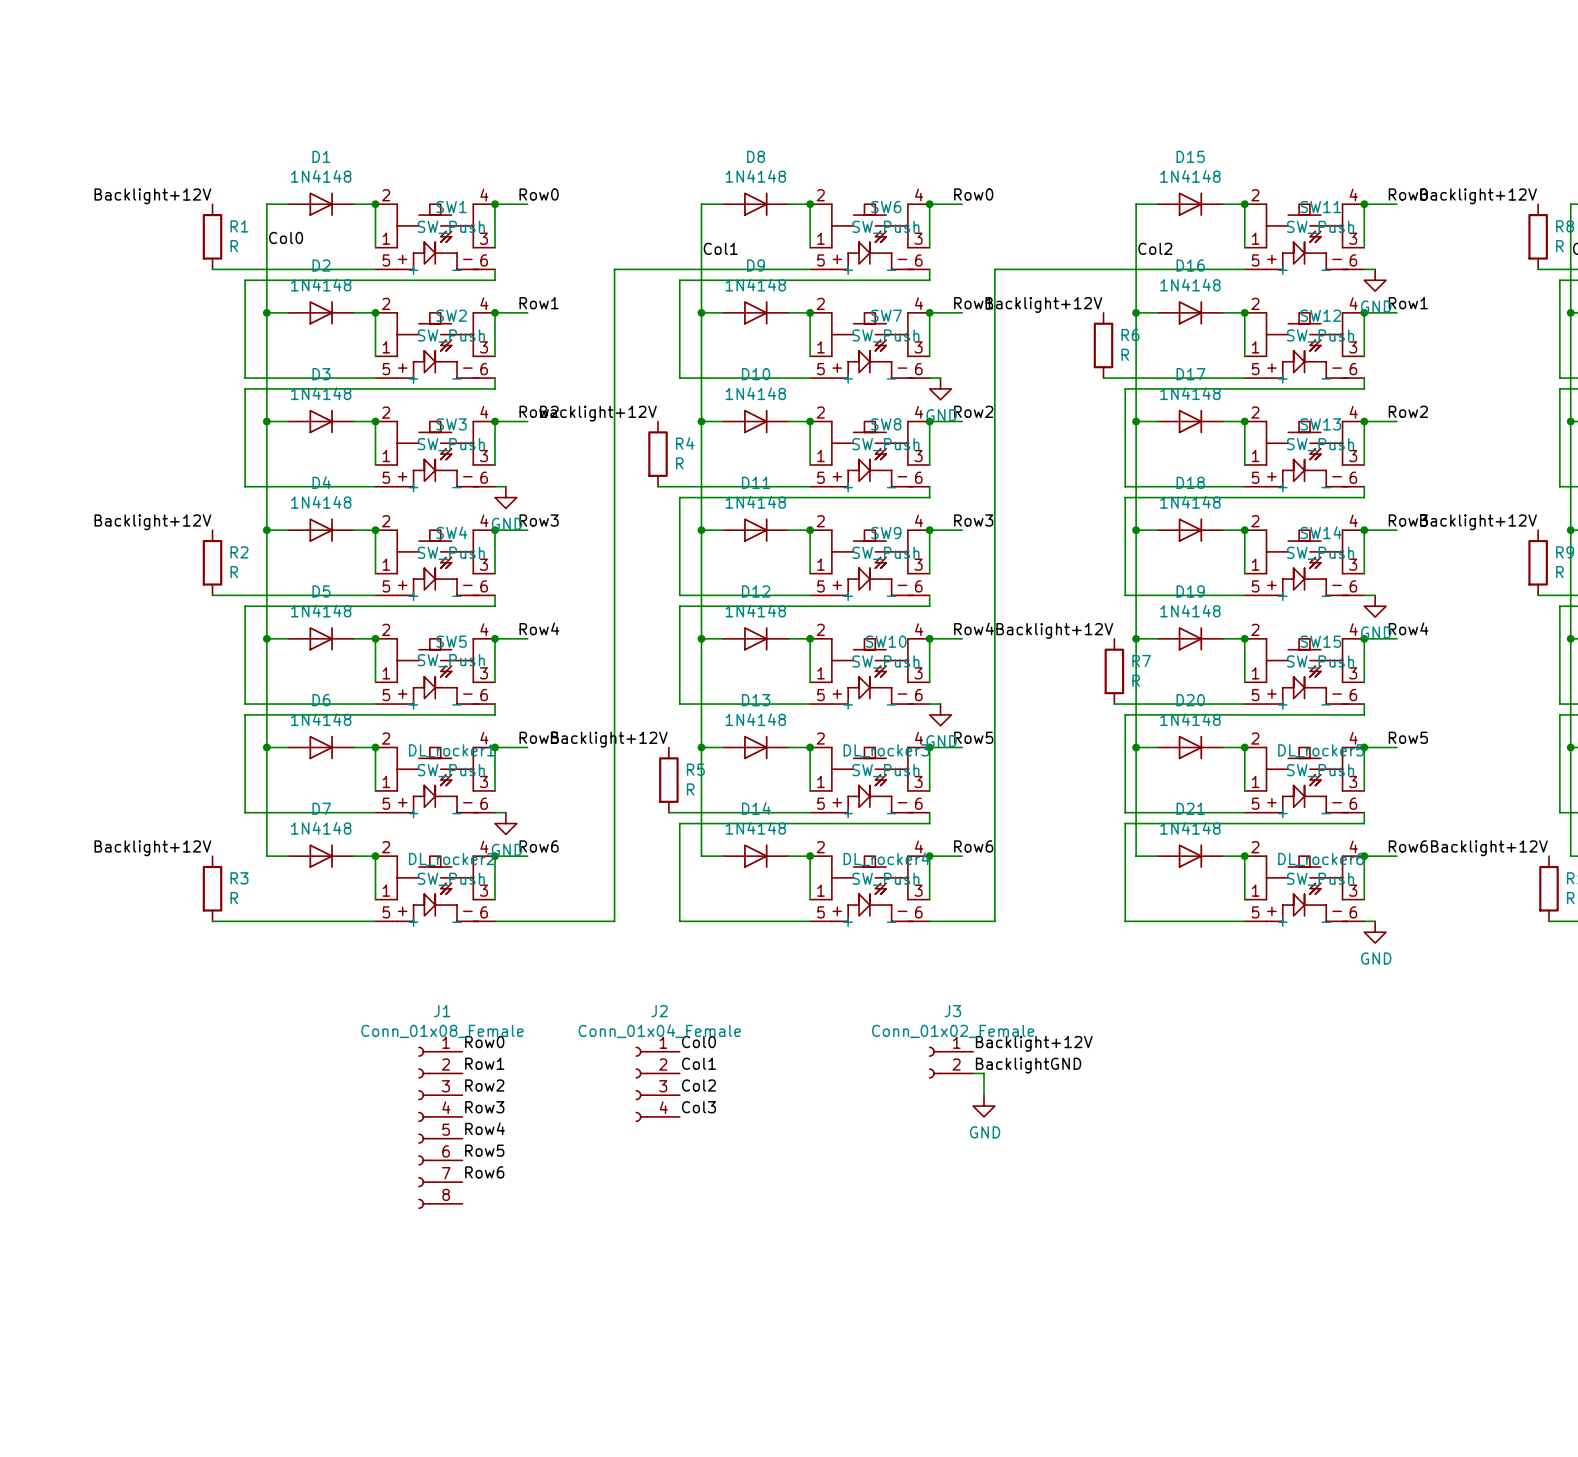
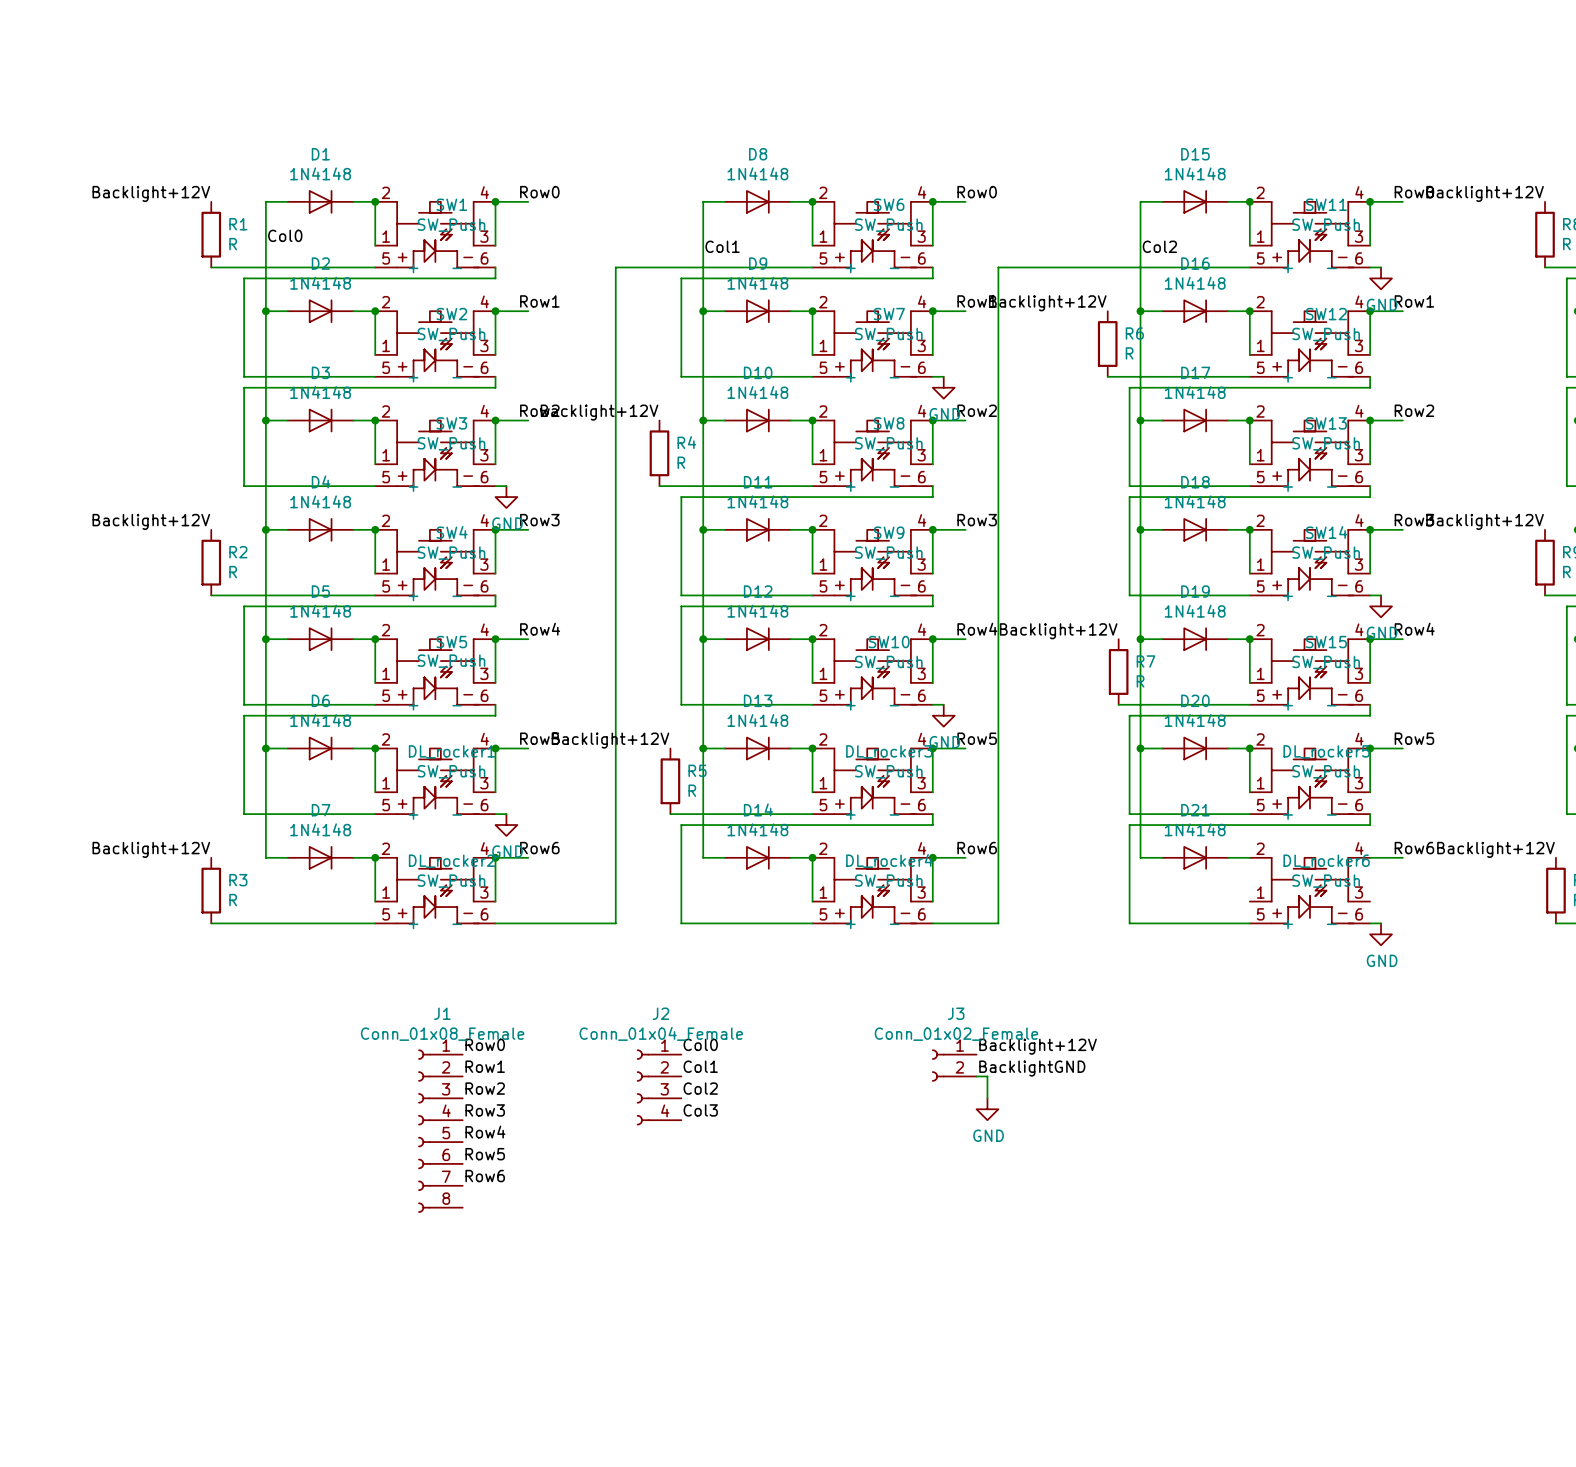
wire: (1244, 856) (1244, 899) -> none
junction: (1244, 856) -> none
wire: (1364, 856) (1364, 899) -> none
junction: (1364, 856) -> none

